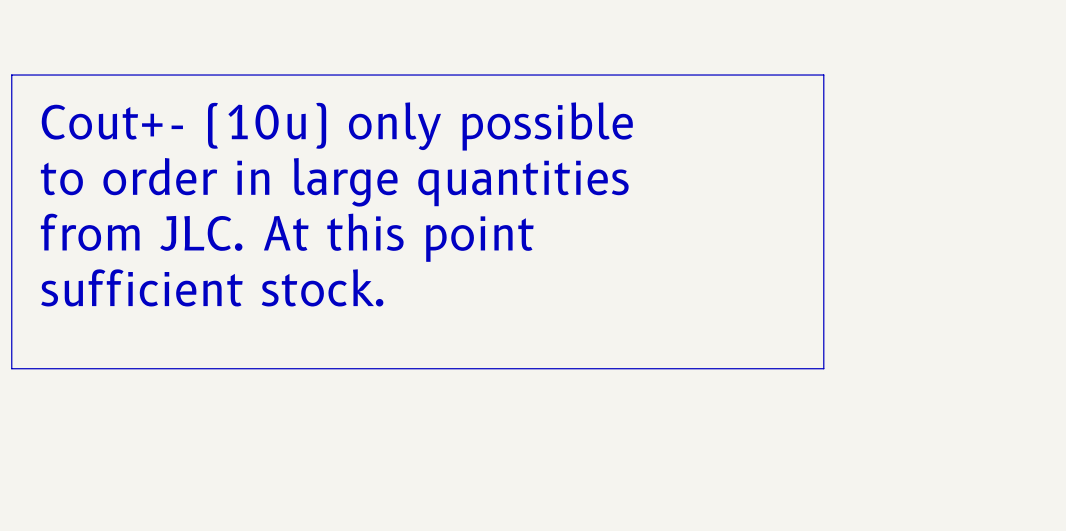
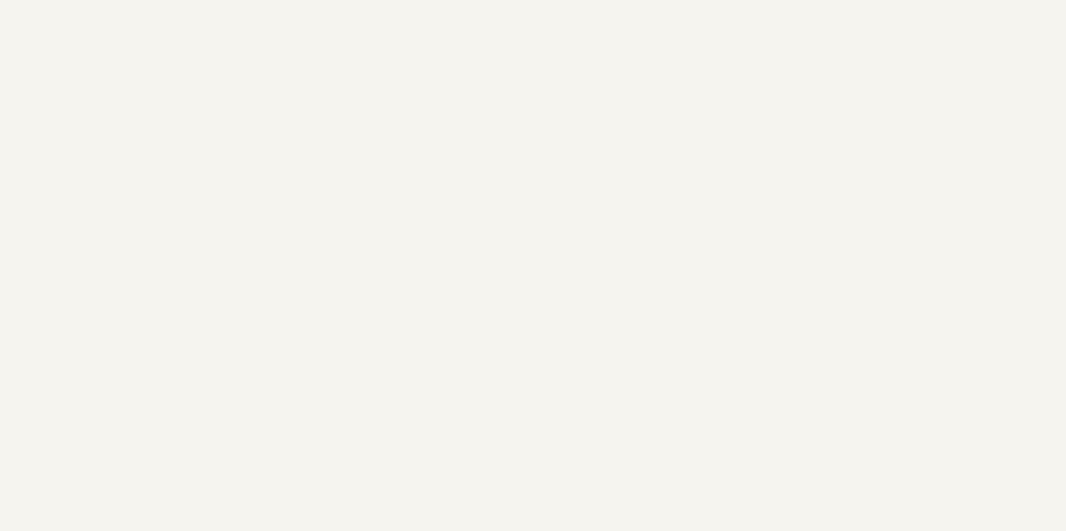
line: (11, 75) (823, 75) (823, 368) (11, 368) (11, 75) -> none
text: Cout+- (10u) only possible (337, 126) -> none
text: to order in large quantities (334, 182) -> none
text: from JLC. At this point (287, 237) -> none
text: sufficient stock. (212, 287) -> none

